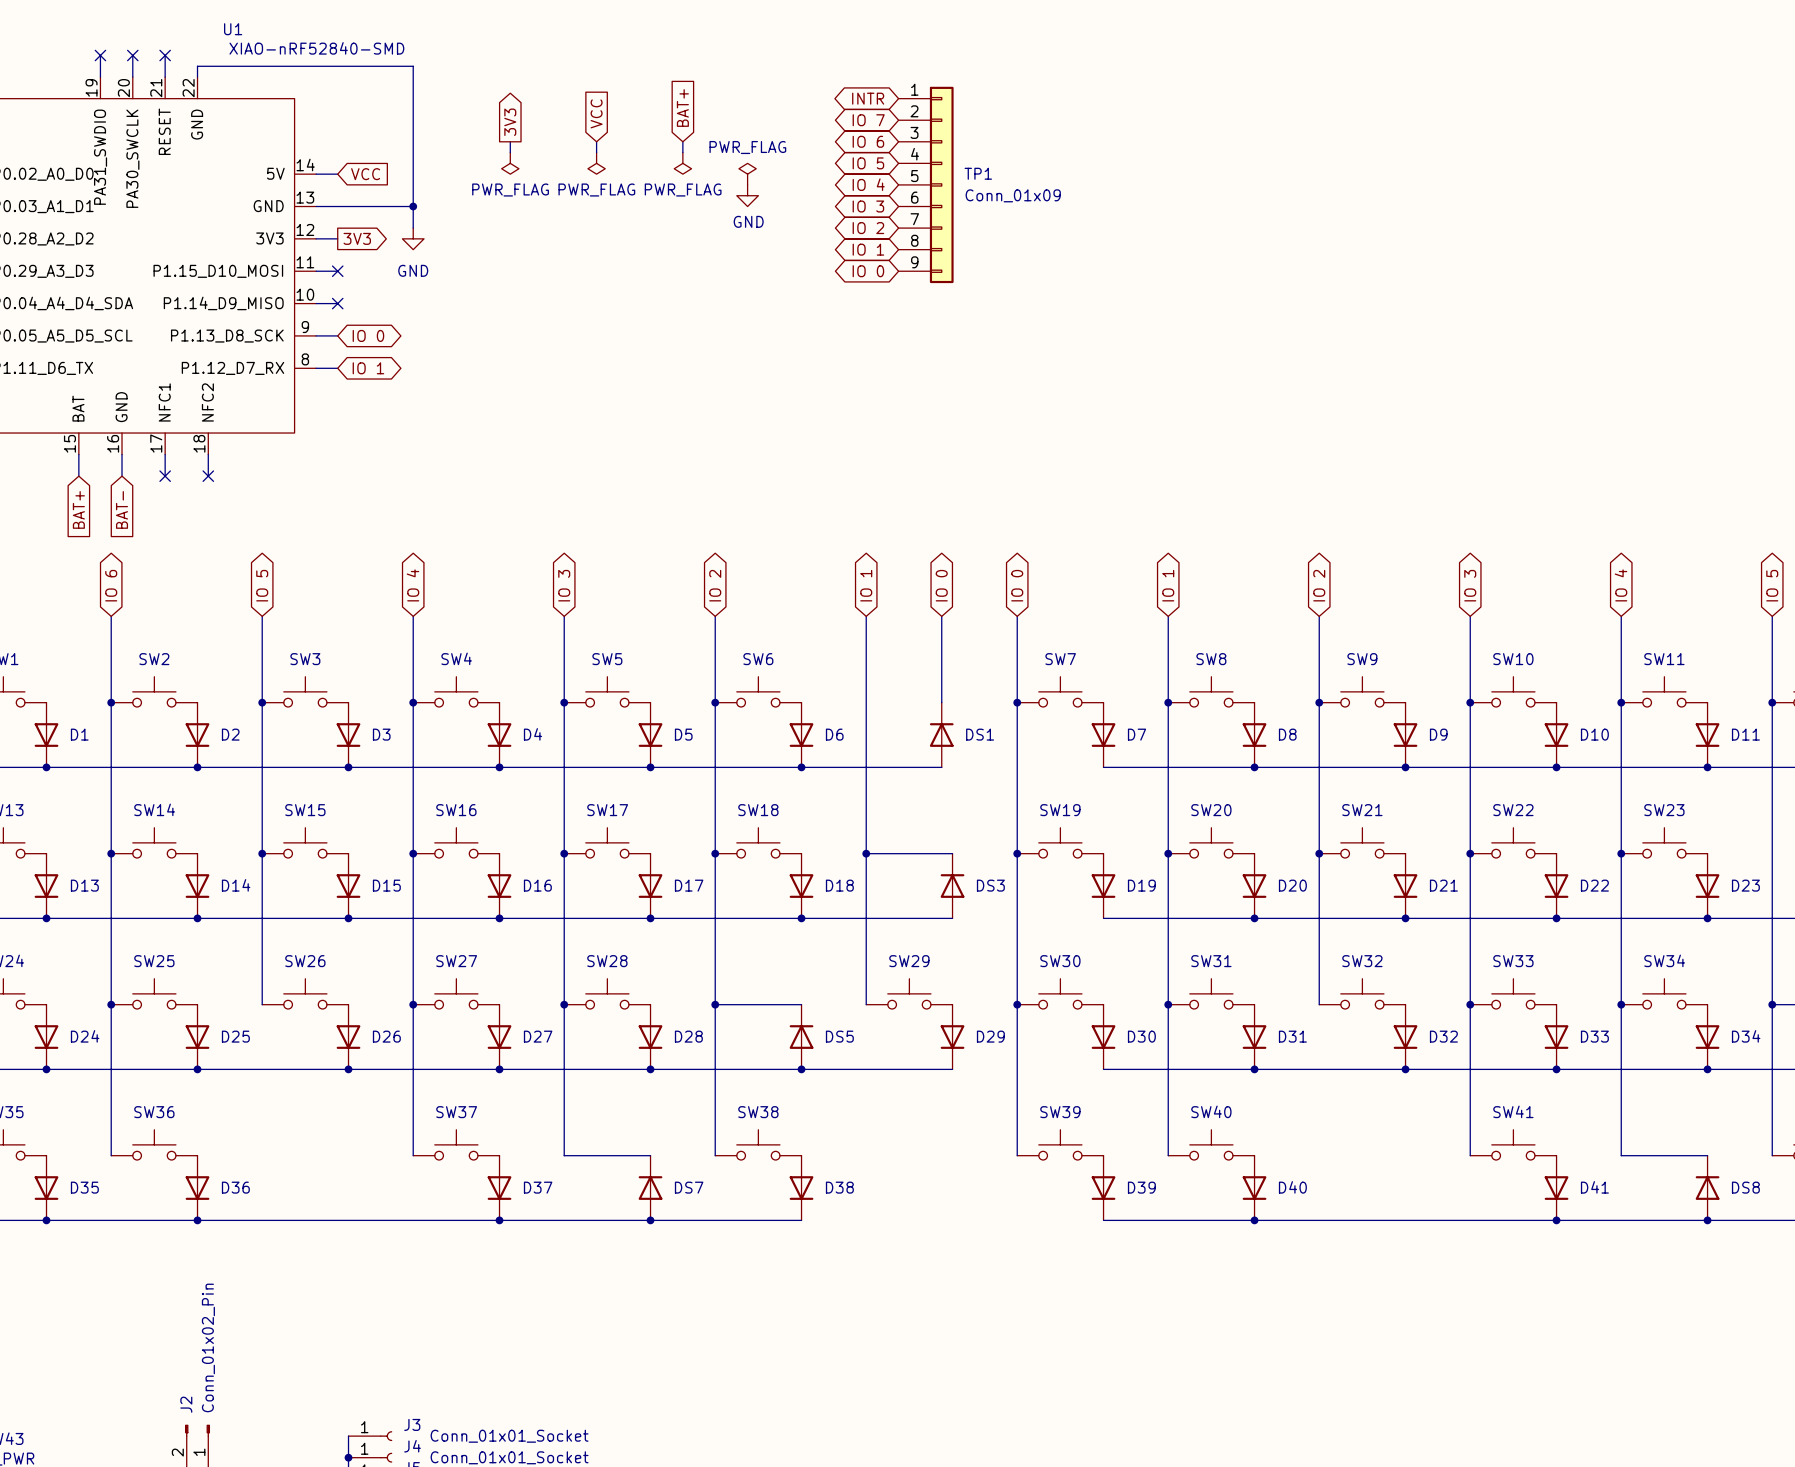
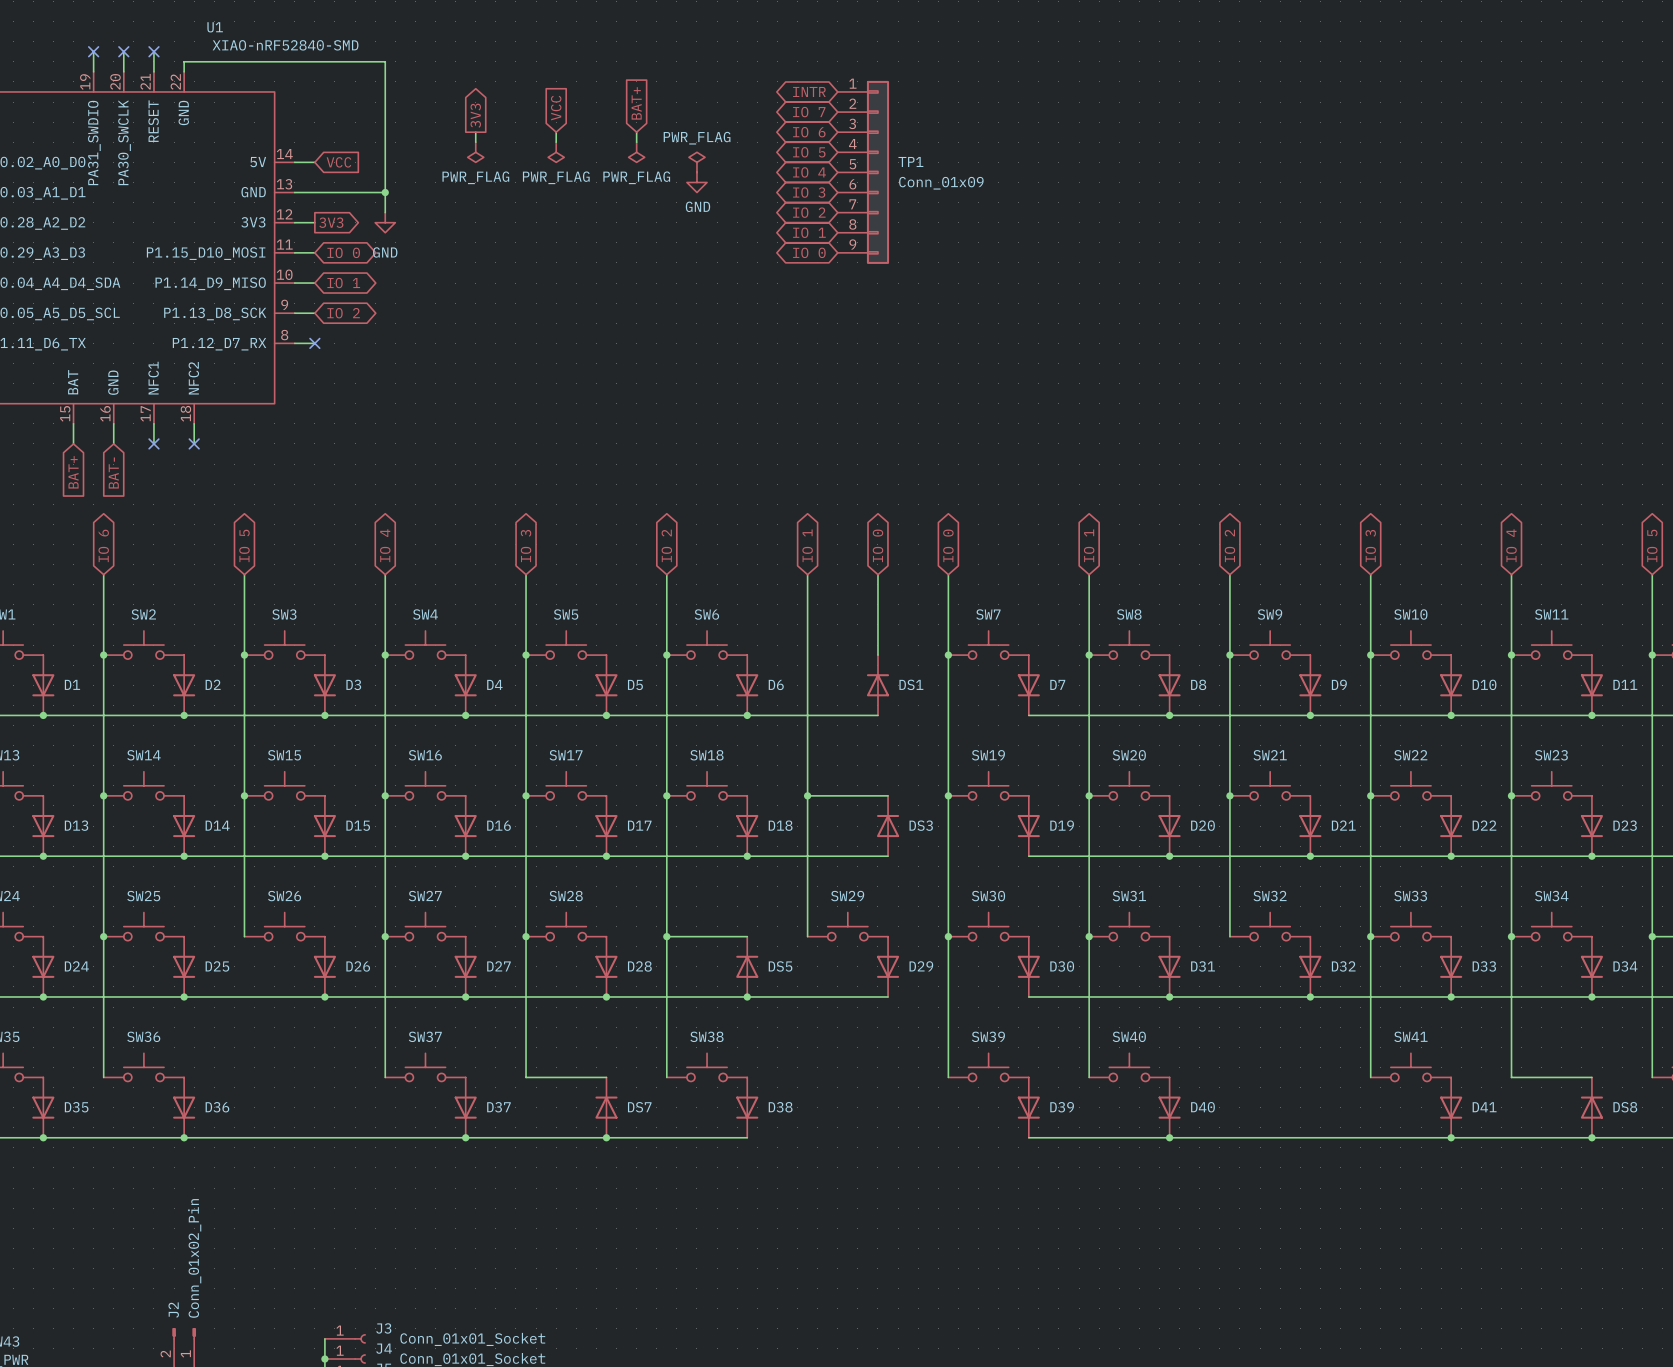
no-connect mark: (337, 271) -> none
global label: none -> IO 0 (343, 252)
no-connect mark: (337, 303) -> none
global label: IO 0 (368, 335) -> IO 2 (343, 313)
no-connect mark: none -> (314, 343)
global label position: IO 1 (368, 368) -> IO 1 (343, 283)

